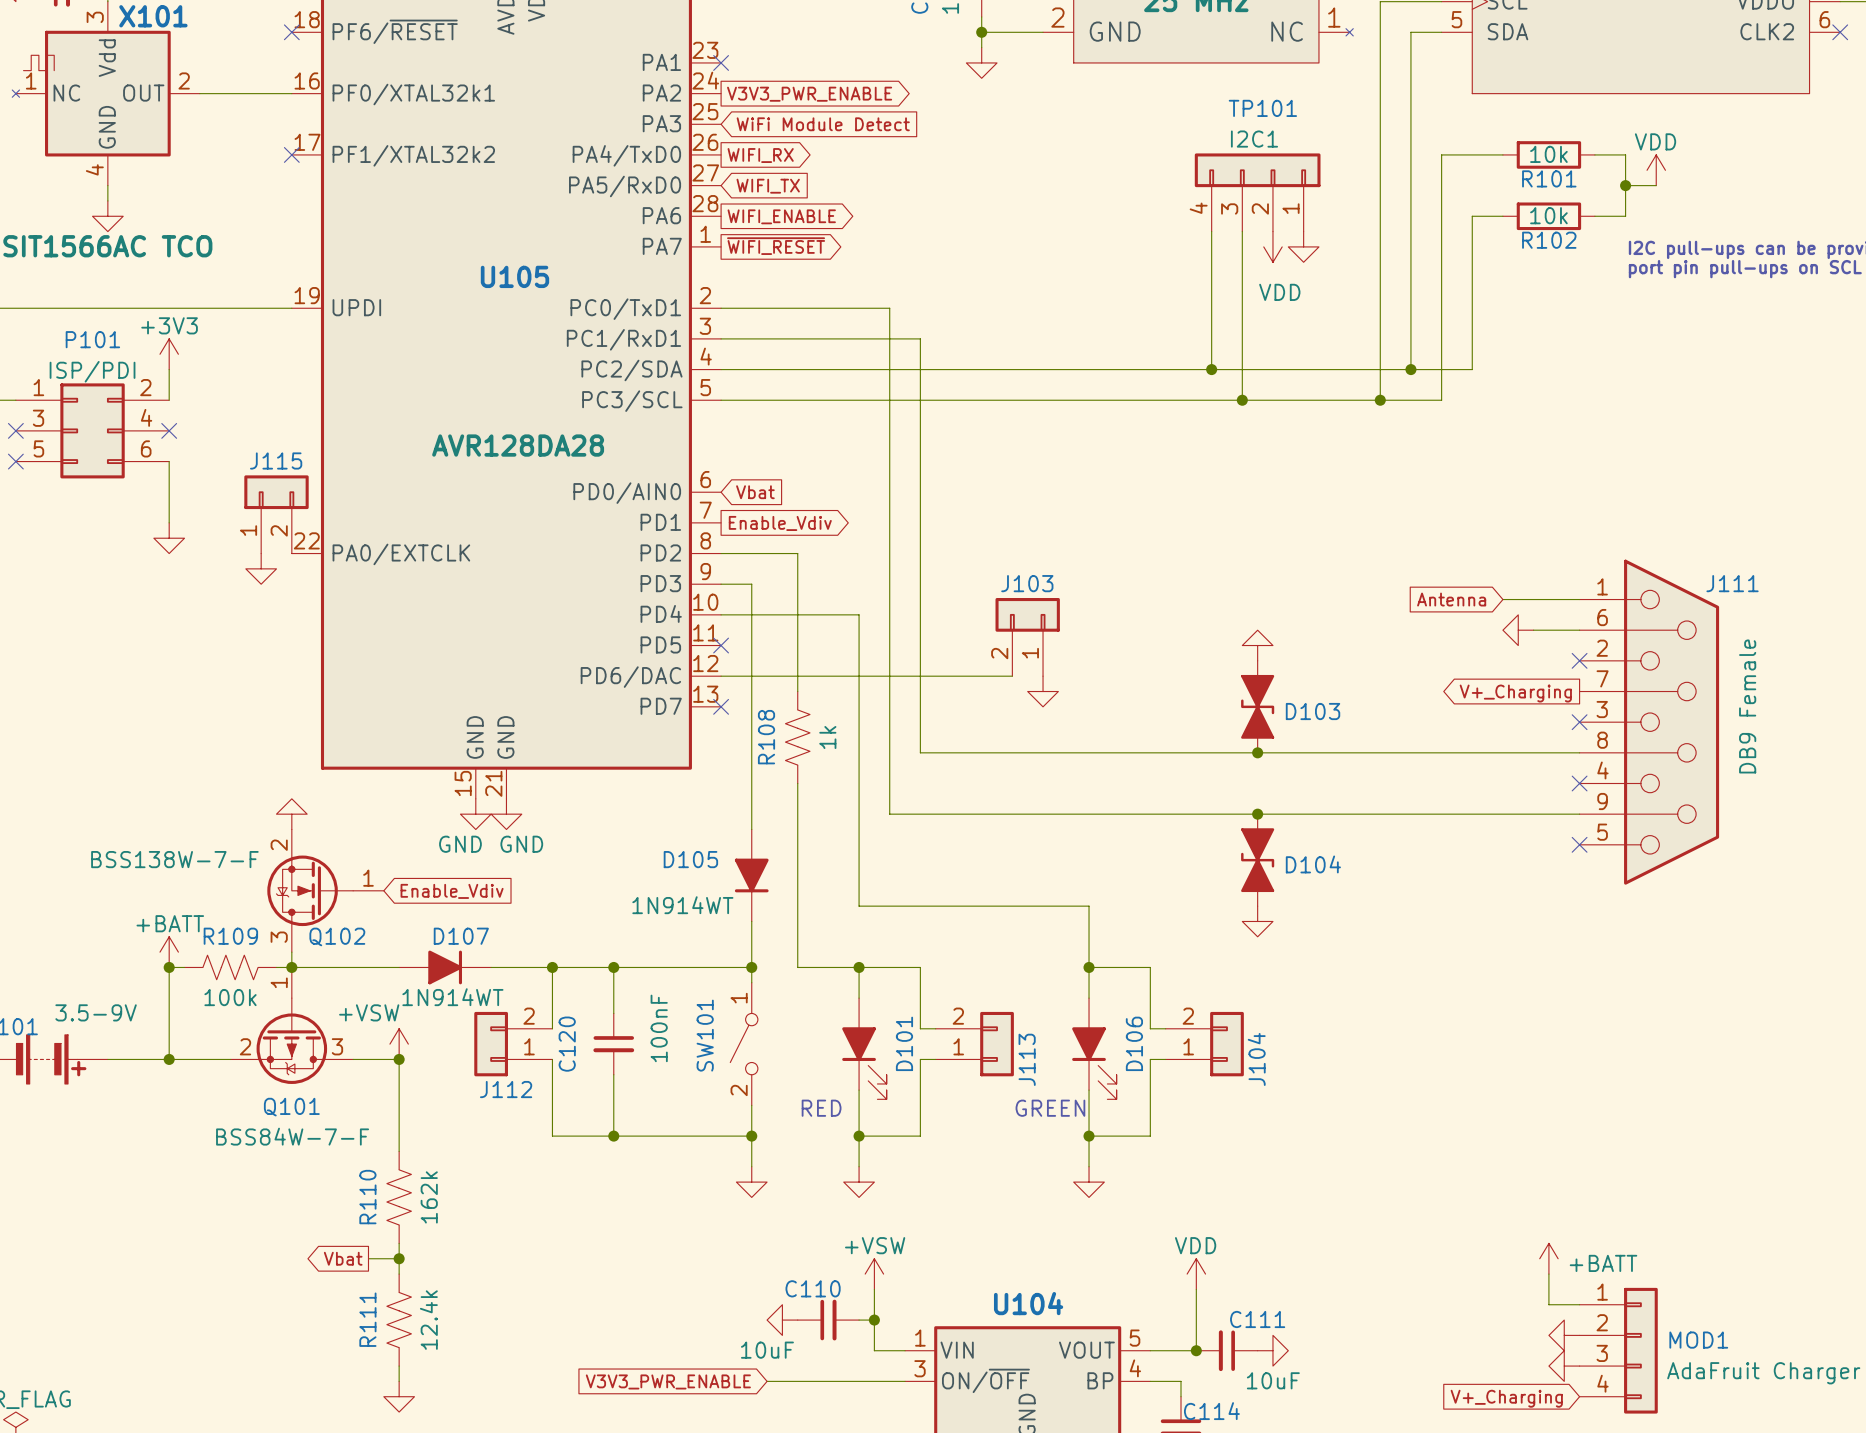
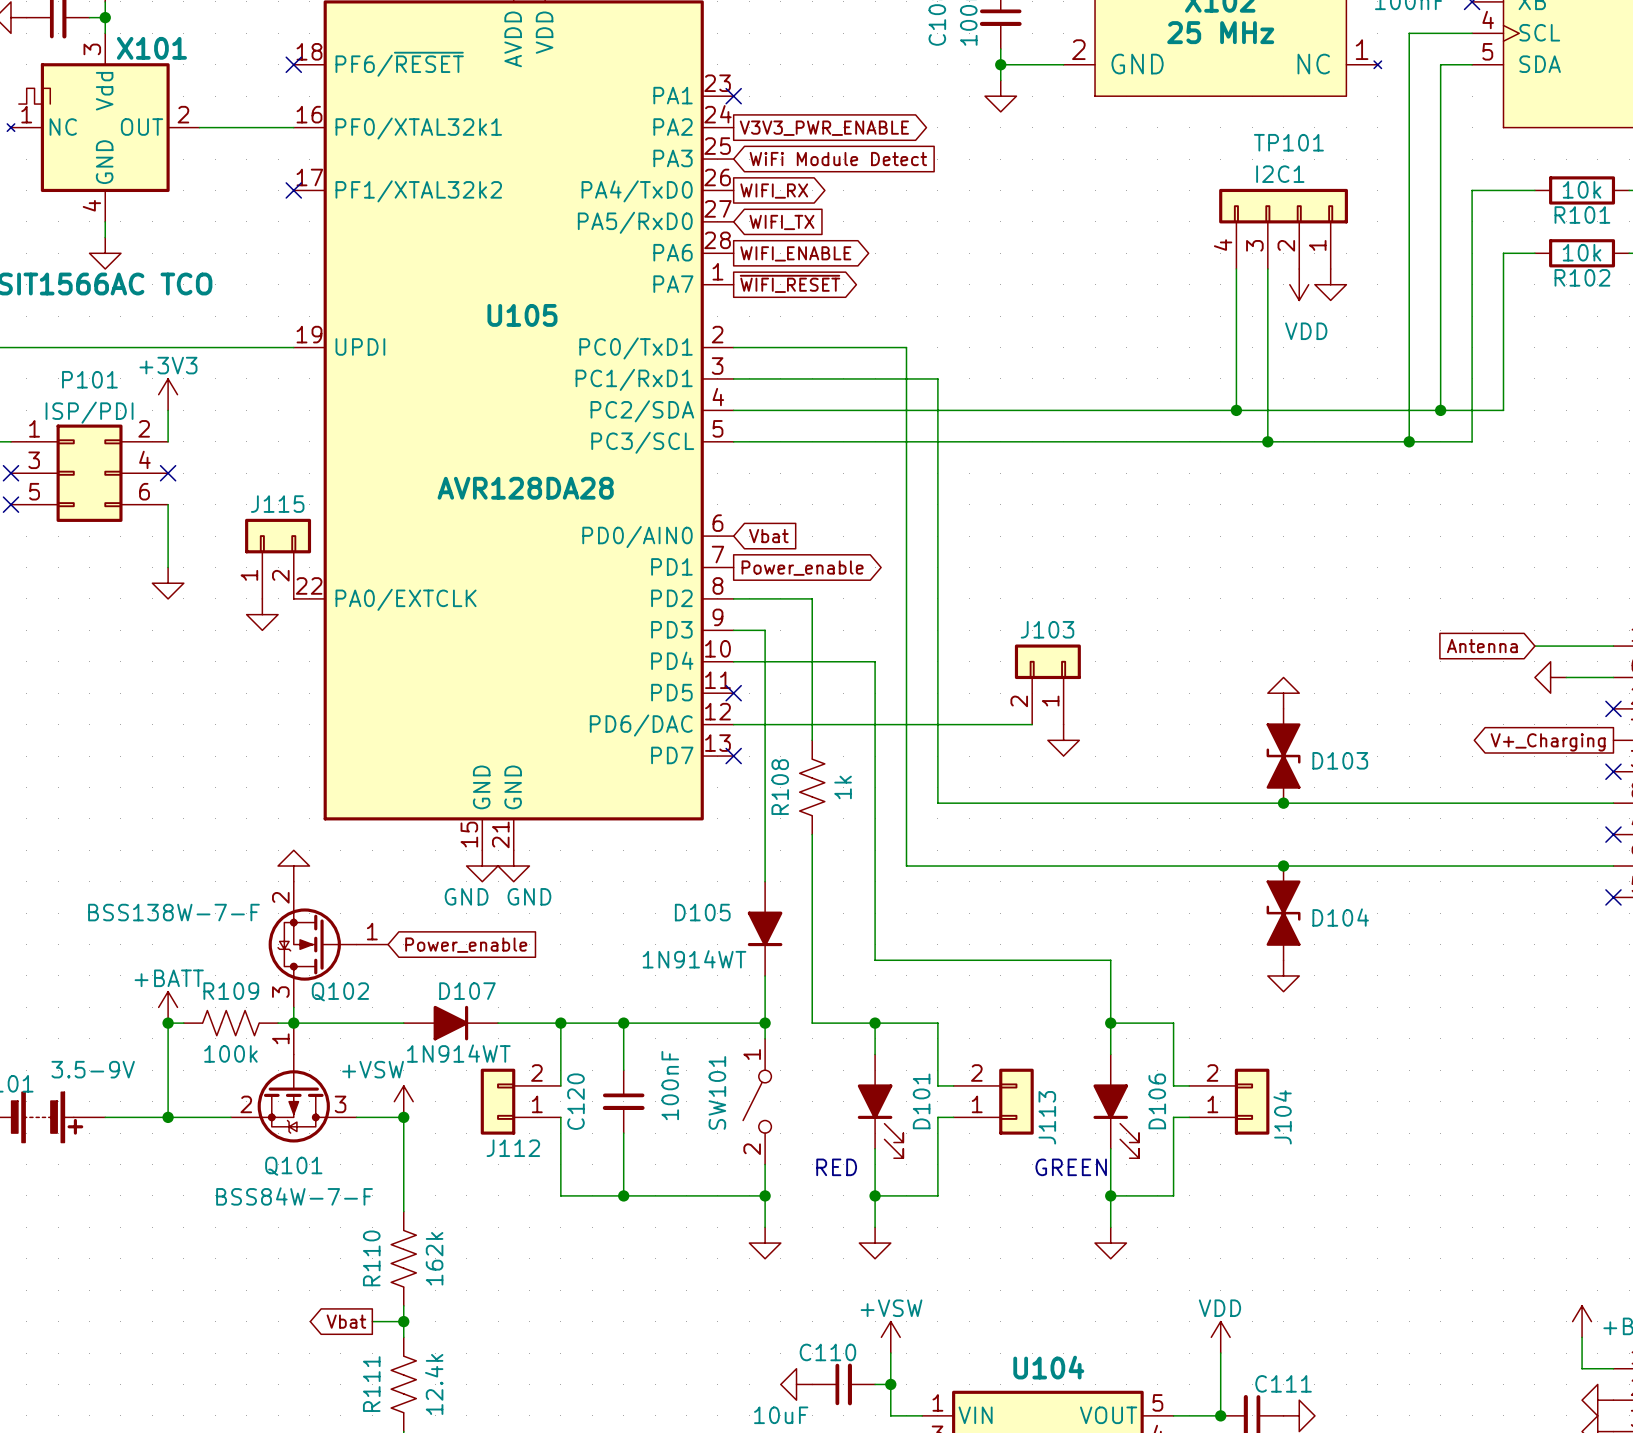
global label: Enable_Vdiv (780, 523) -> Power_enable (802, 568)
global label: Enable_Vdiv (452, 891) -> Power_enable (466, 945)

